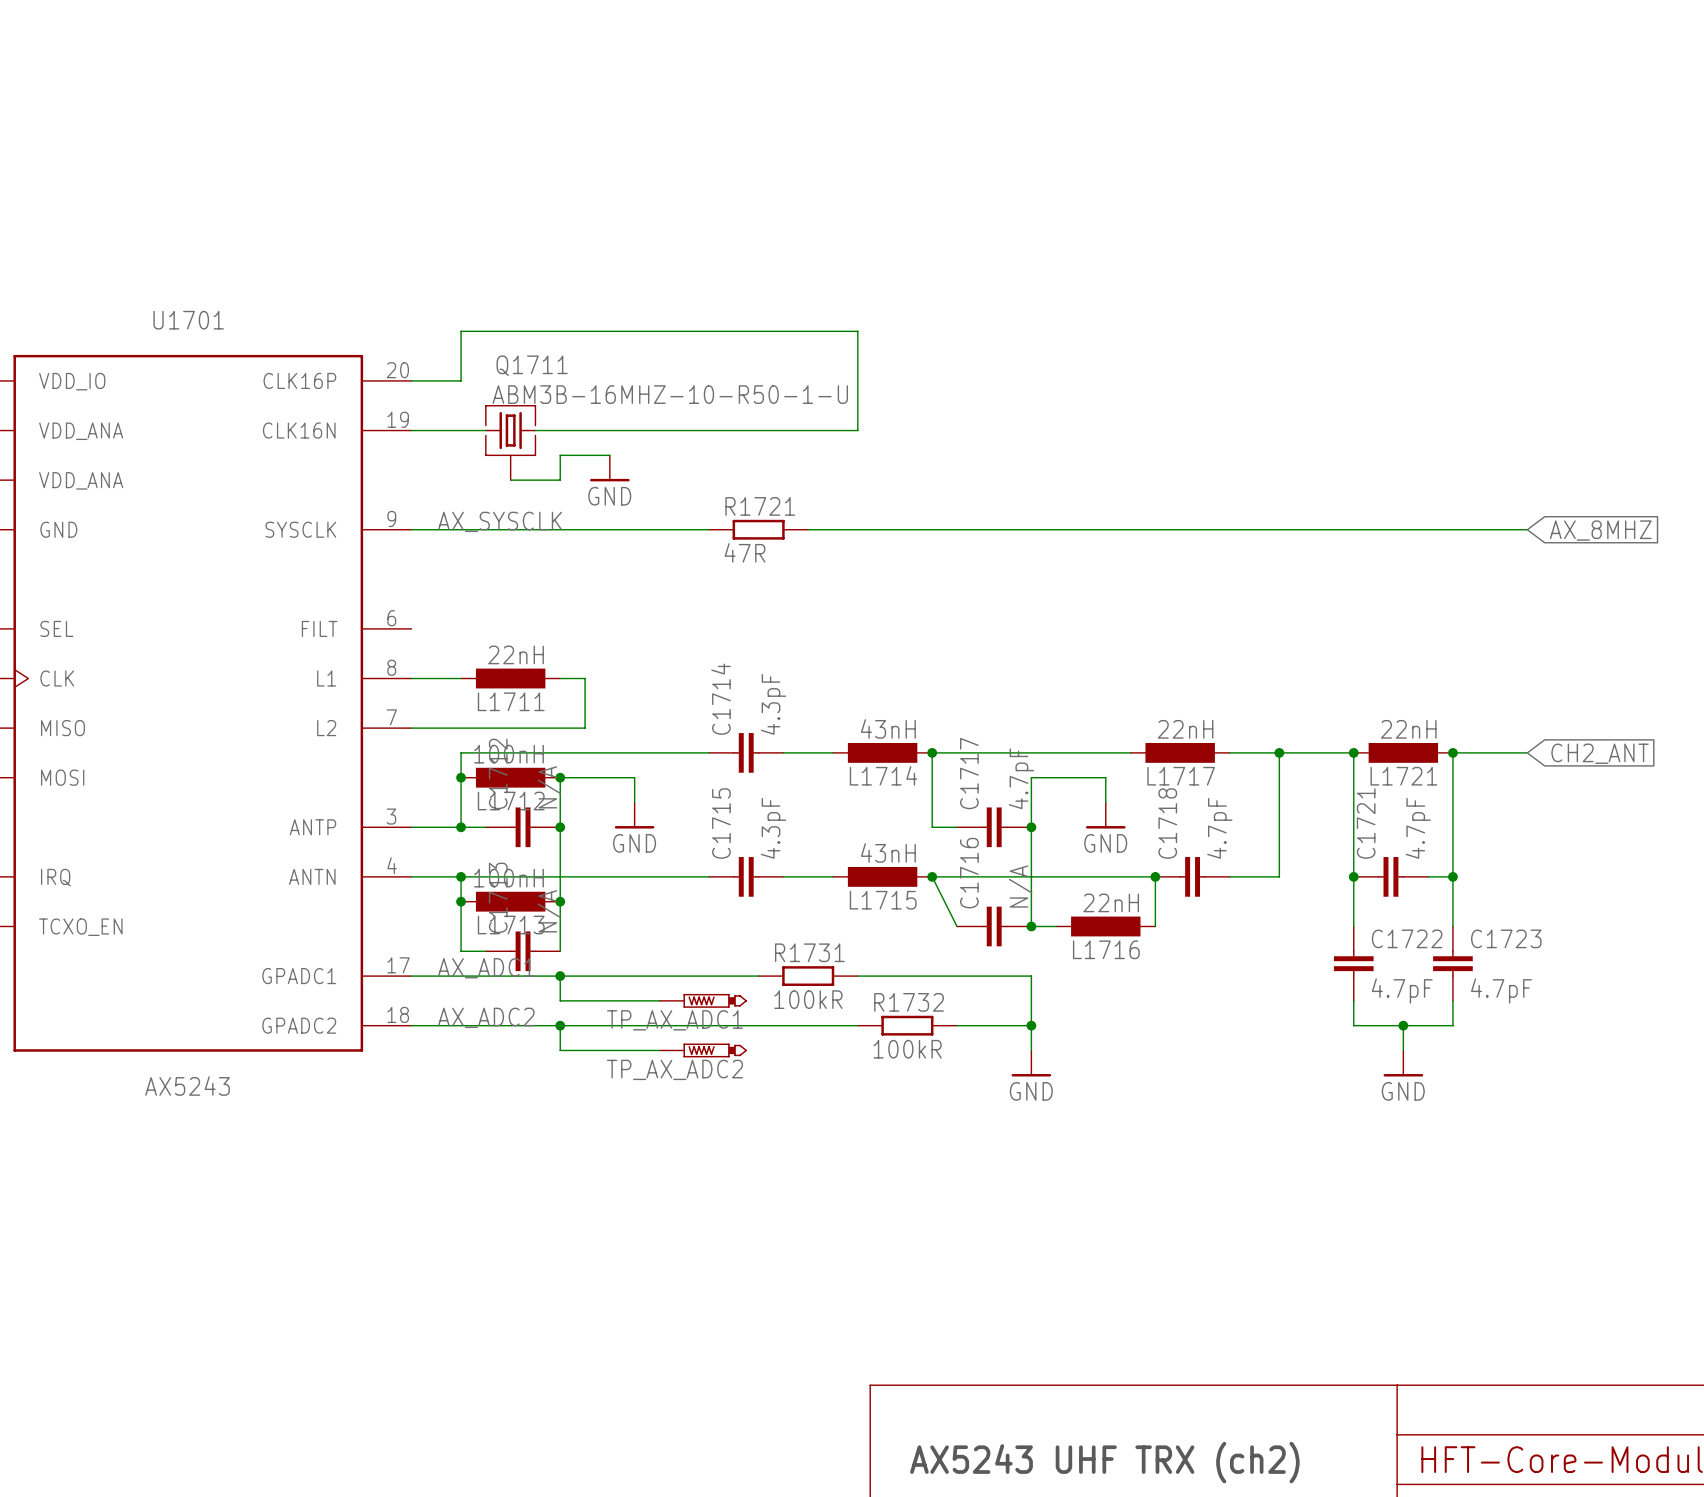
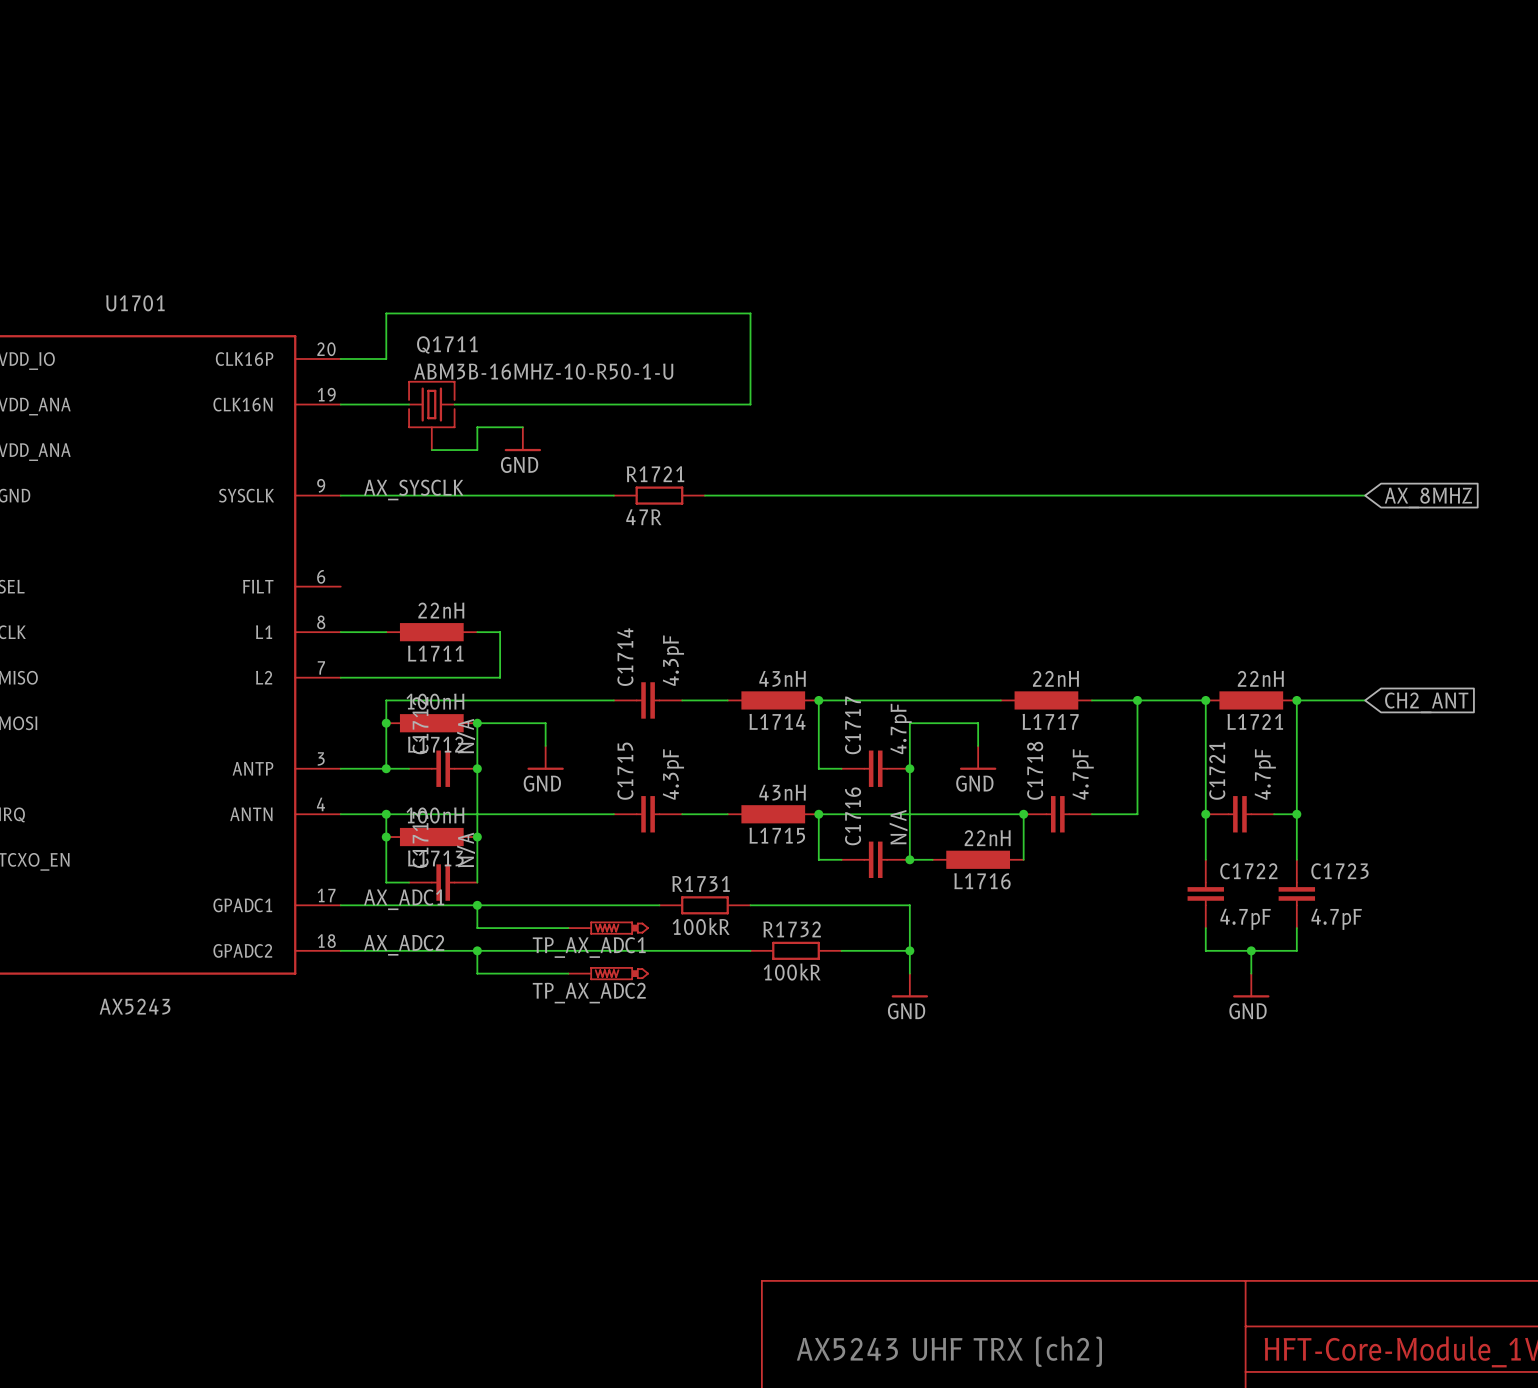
wire: (932, 876) (957, 926) -> (818, 814) (818, 859) (841, 859)

